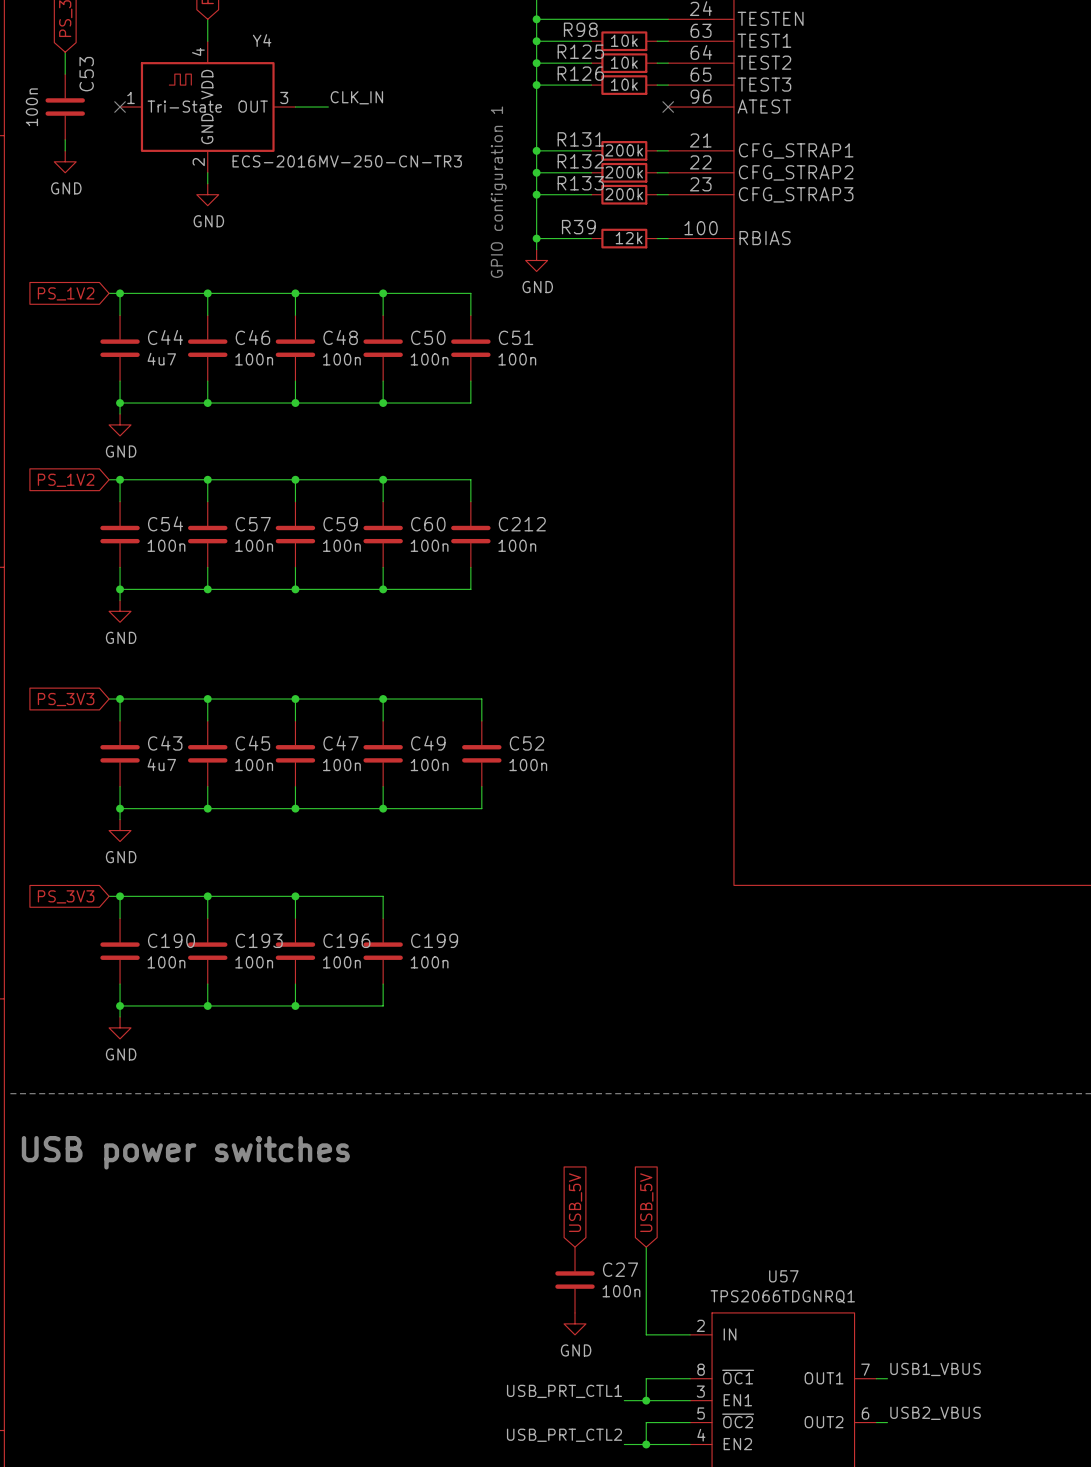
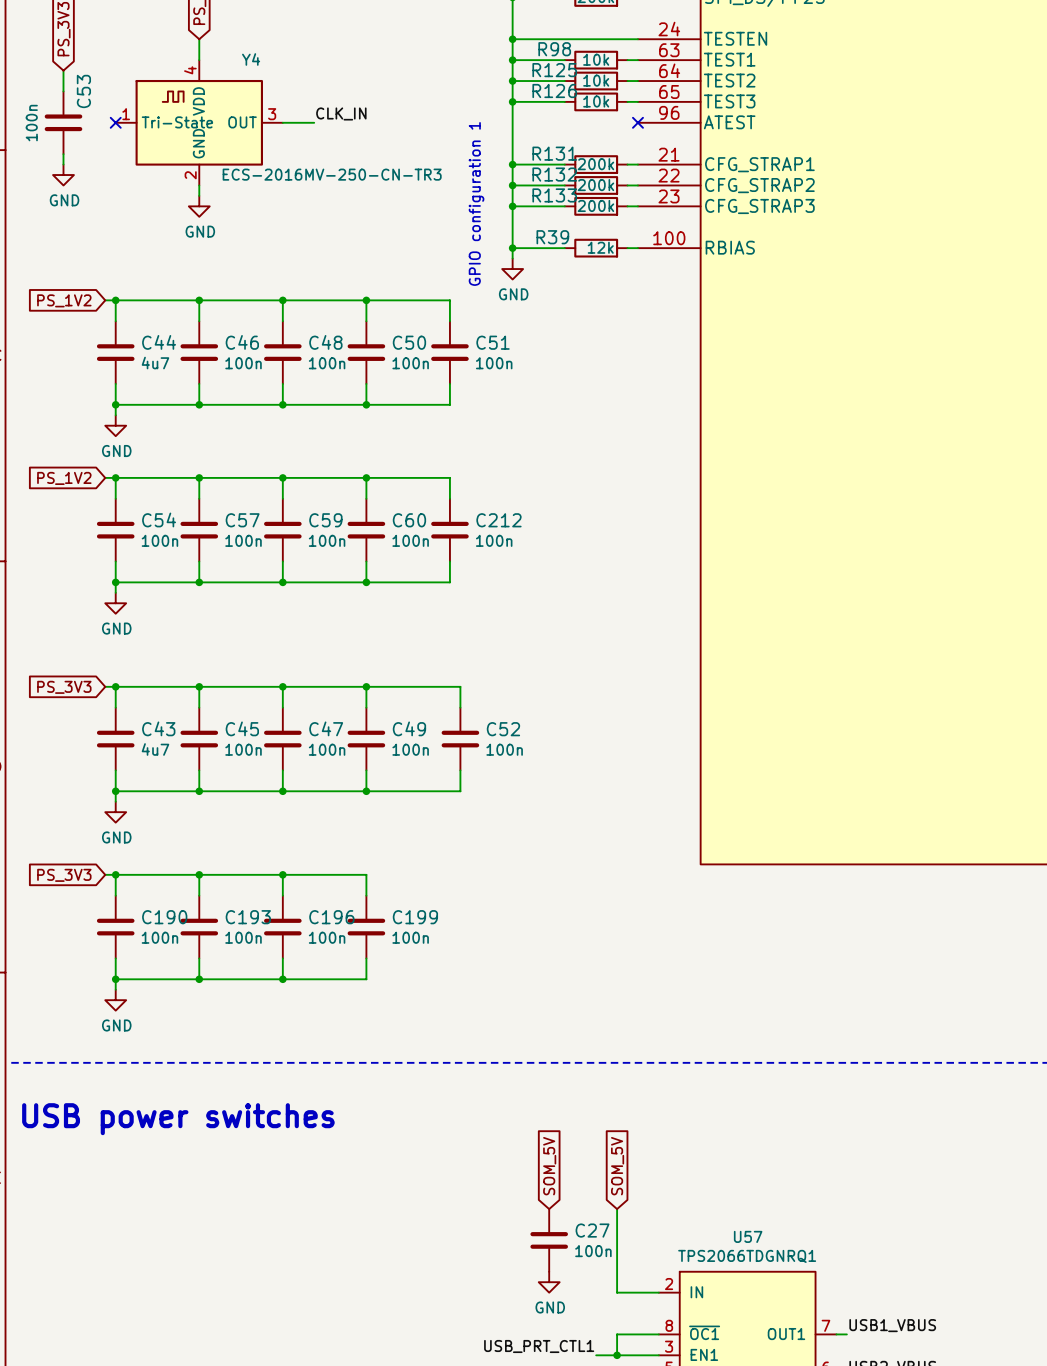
global label: USB_5V (575, 1202) -> SOM_5V (549, 1166)
global label: USB_5V (646, 1202) -> SOM_5V (617, 1166)

